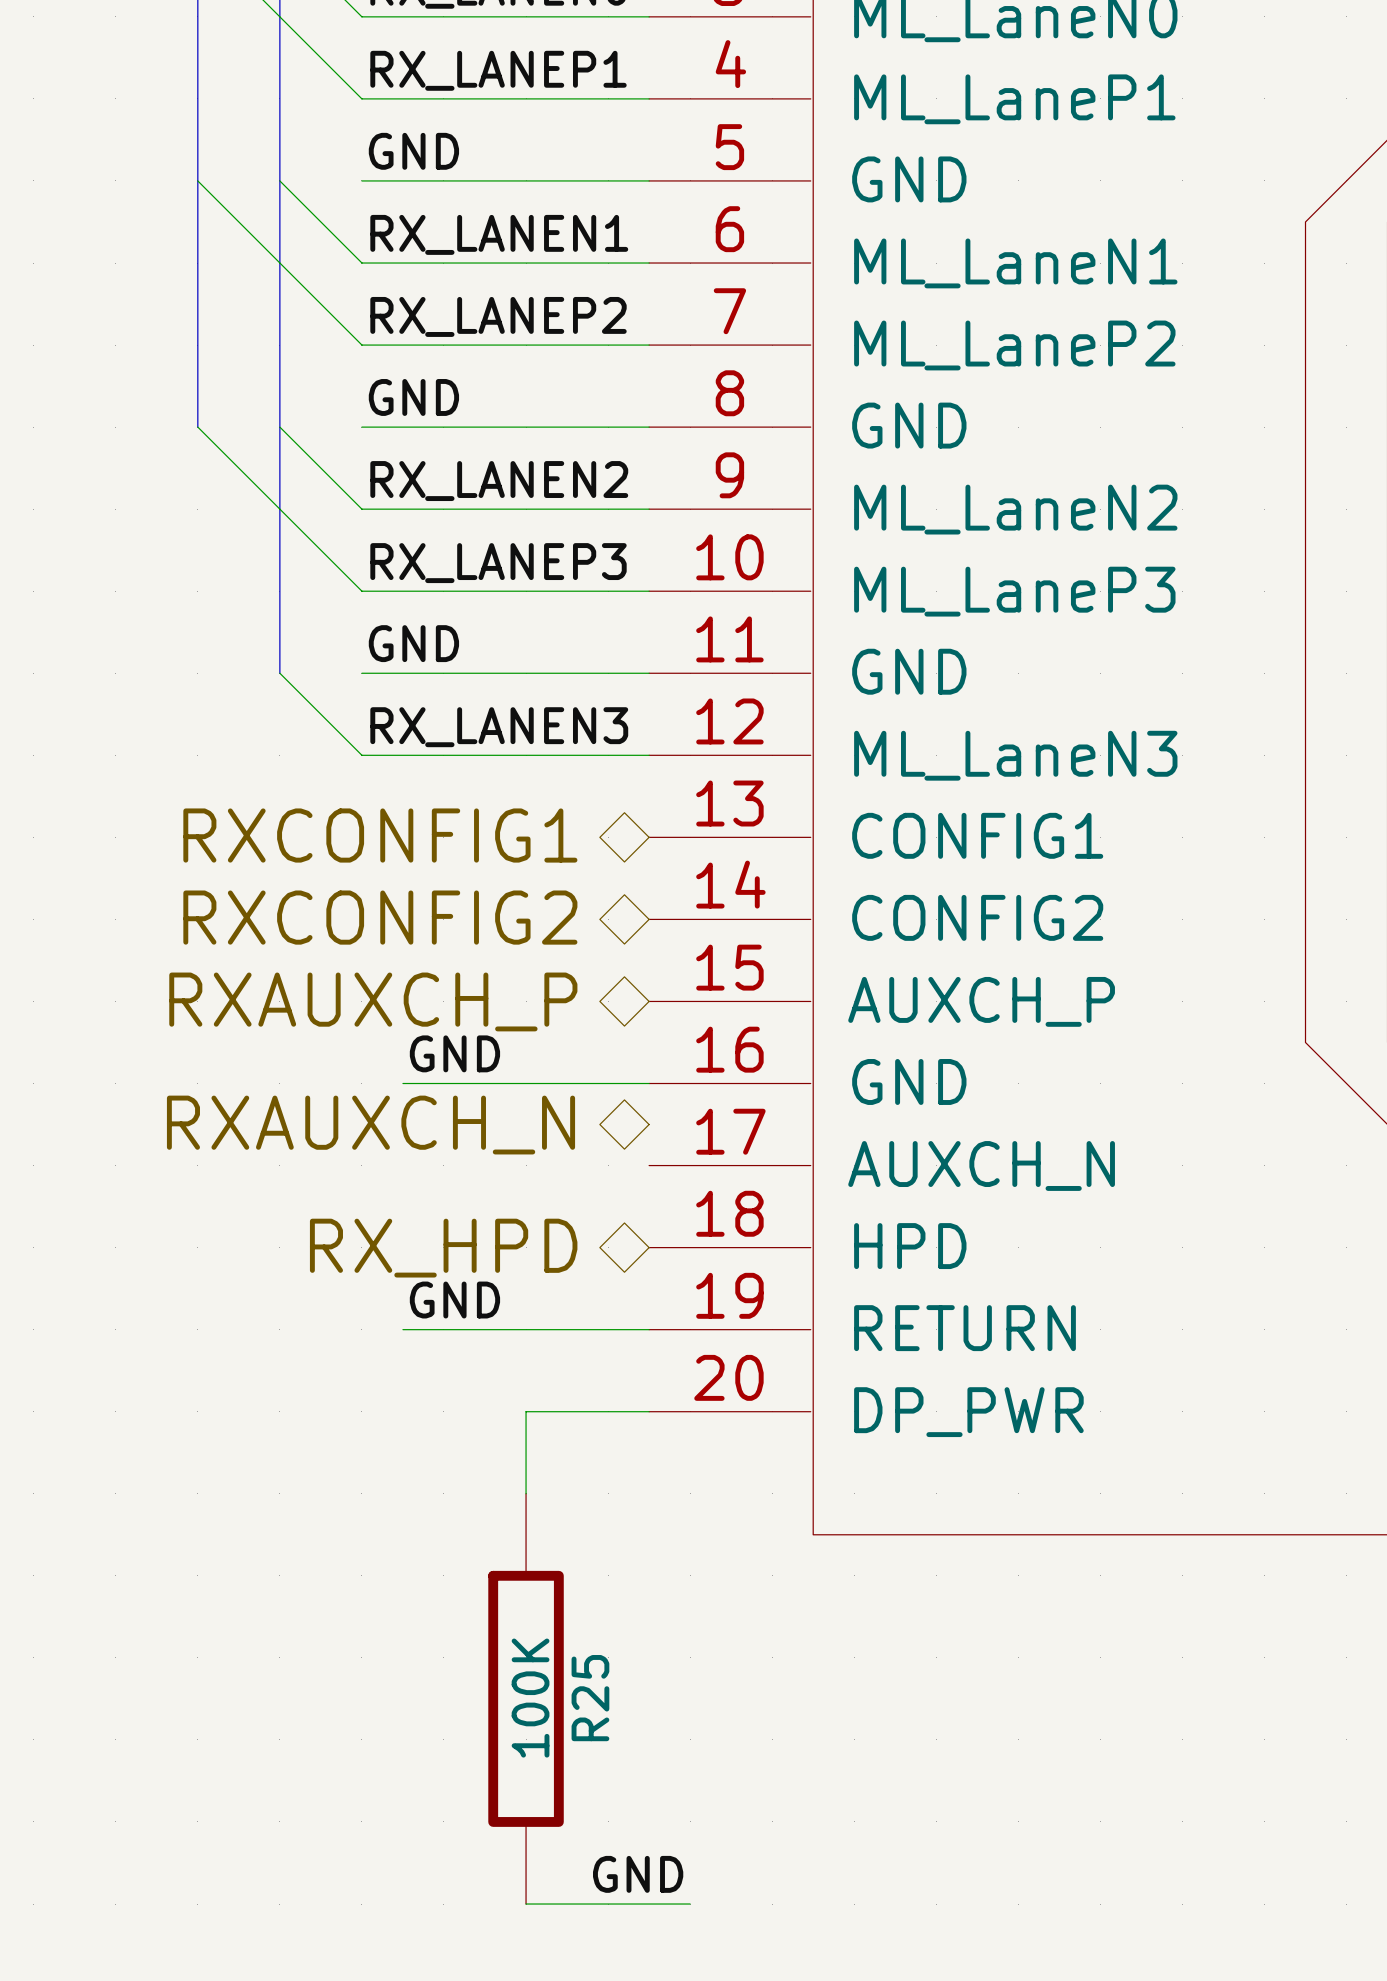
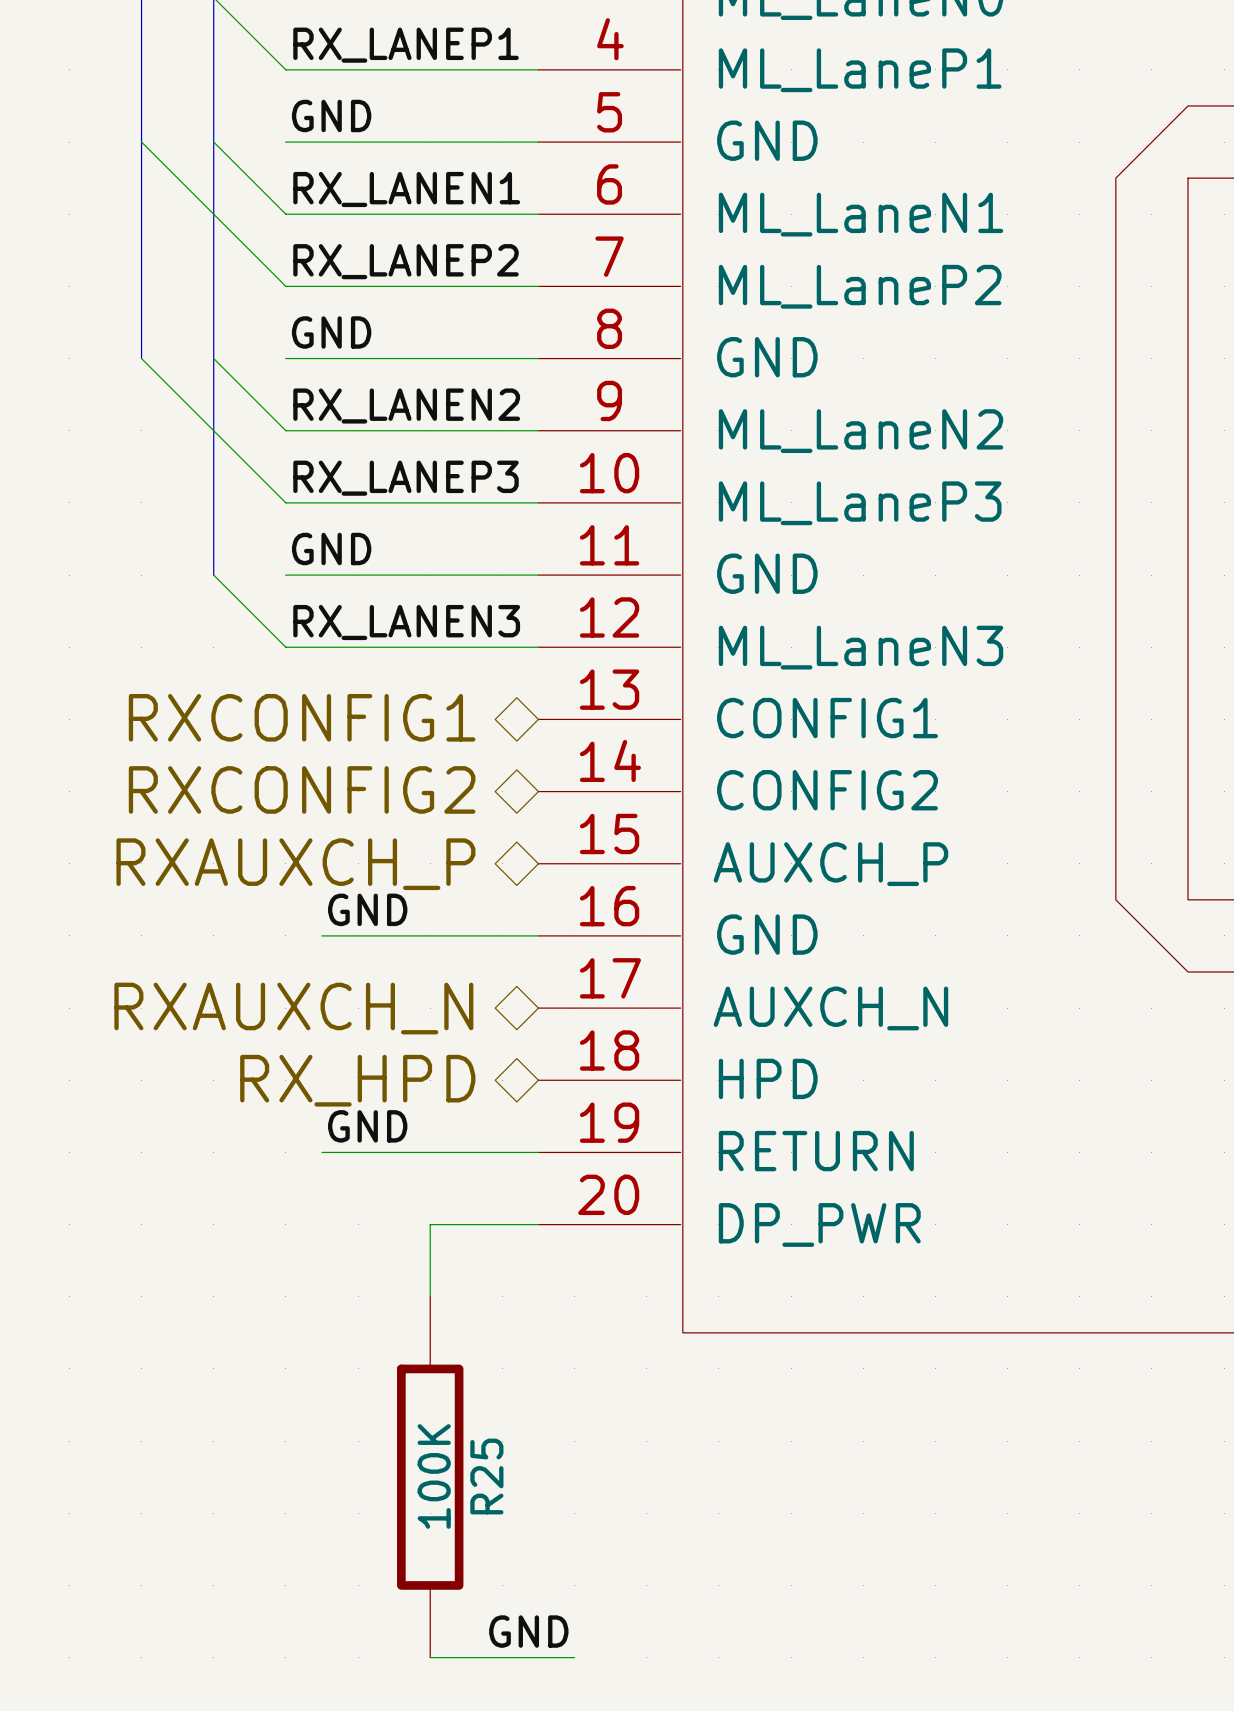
hierarchical label position: RXAUXCH_N (371, 1125) -> RXAUXCH_N (293, 1008)

